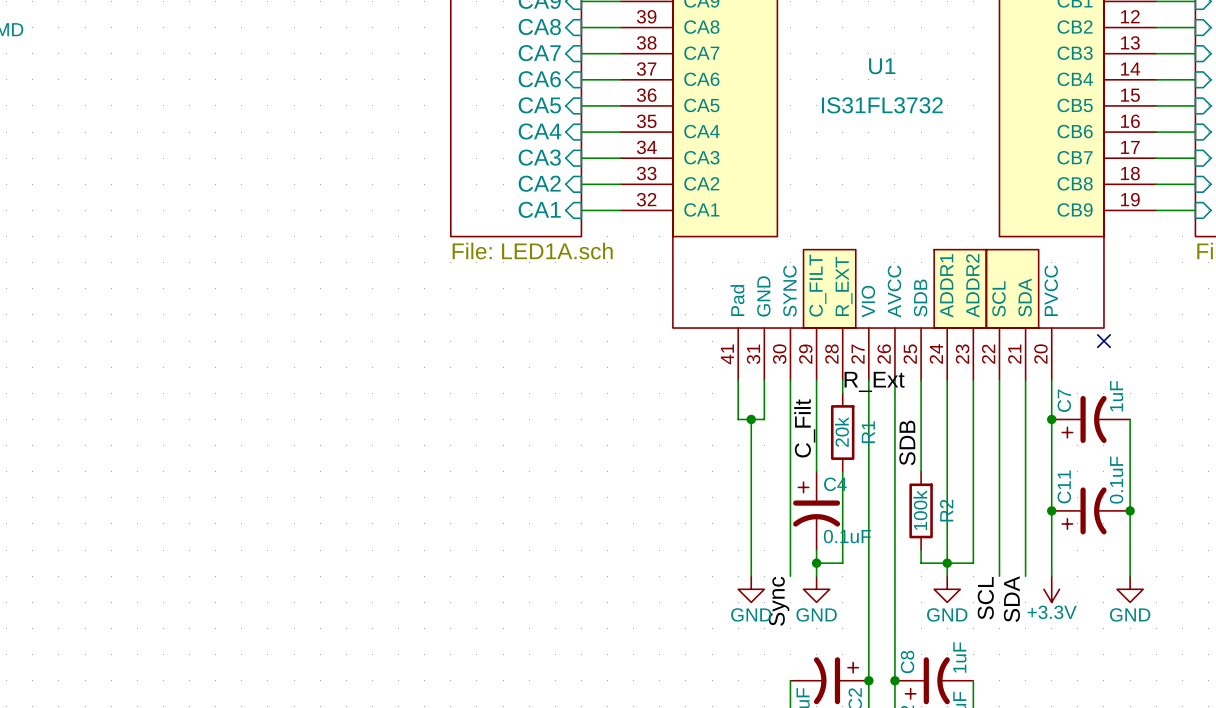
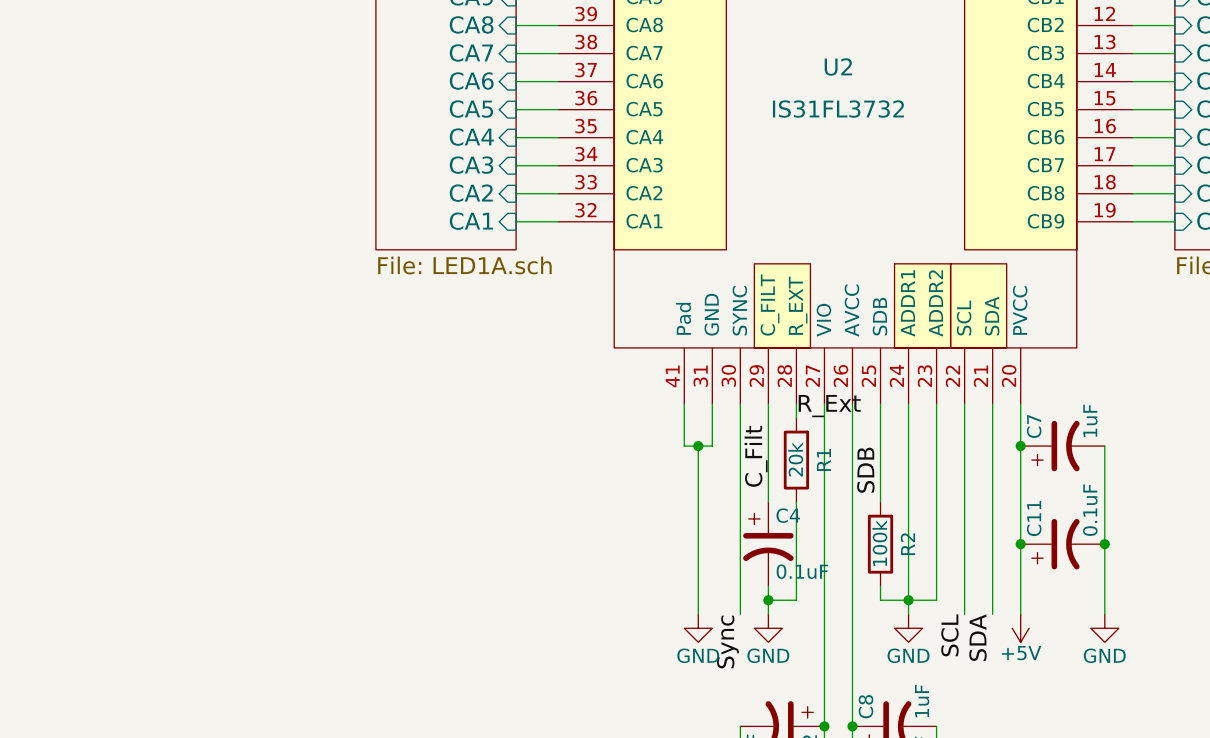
U1 name: U1 (882, 66) -> U2 (838, 66)
no-connect mark: (1103, 341) -> none
power symbol: +3.3V (1051, 589) -> +5V (1020, 628)

